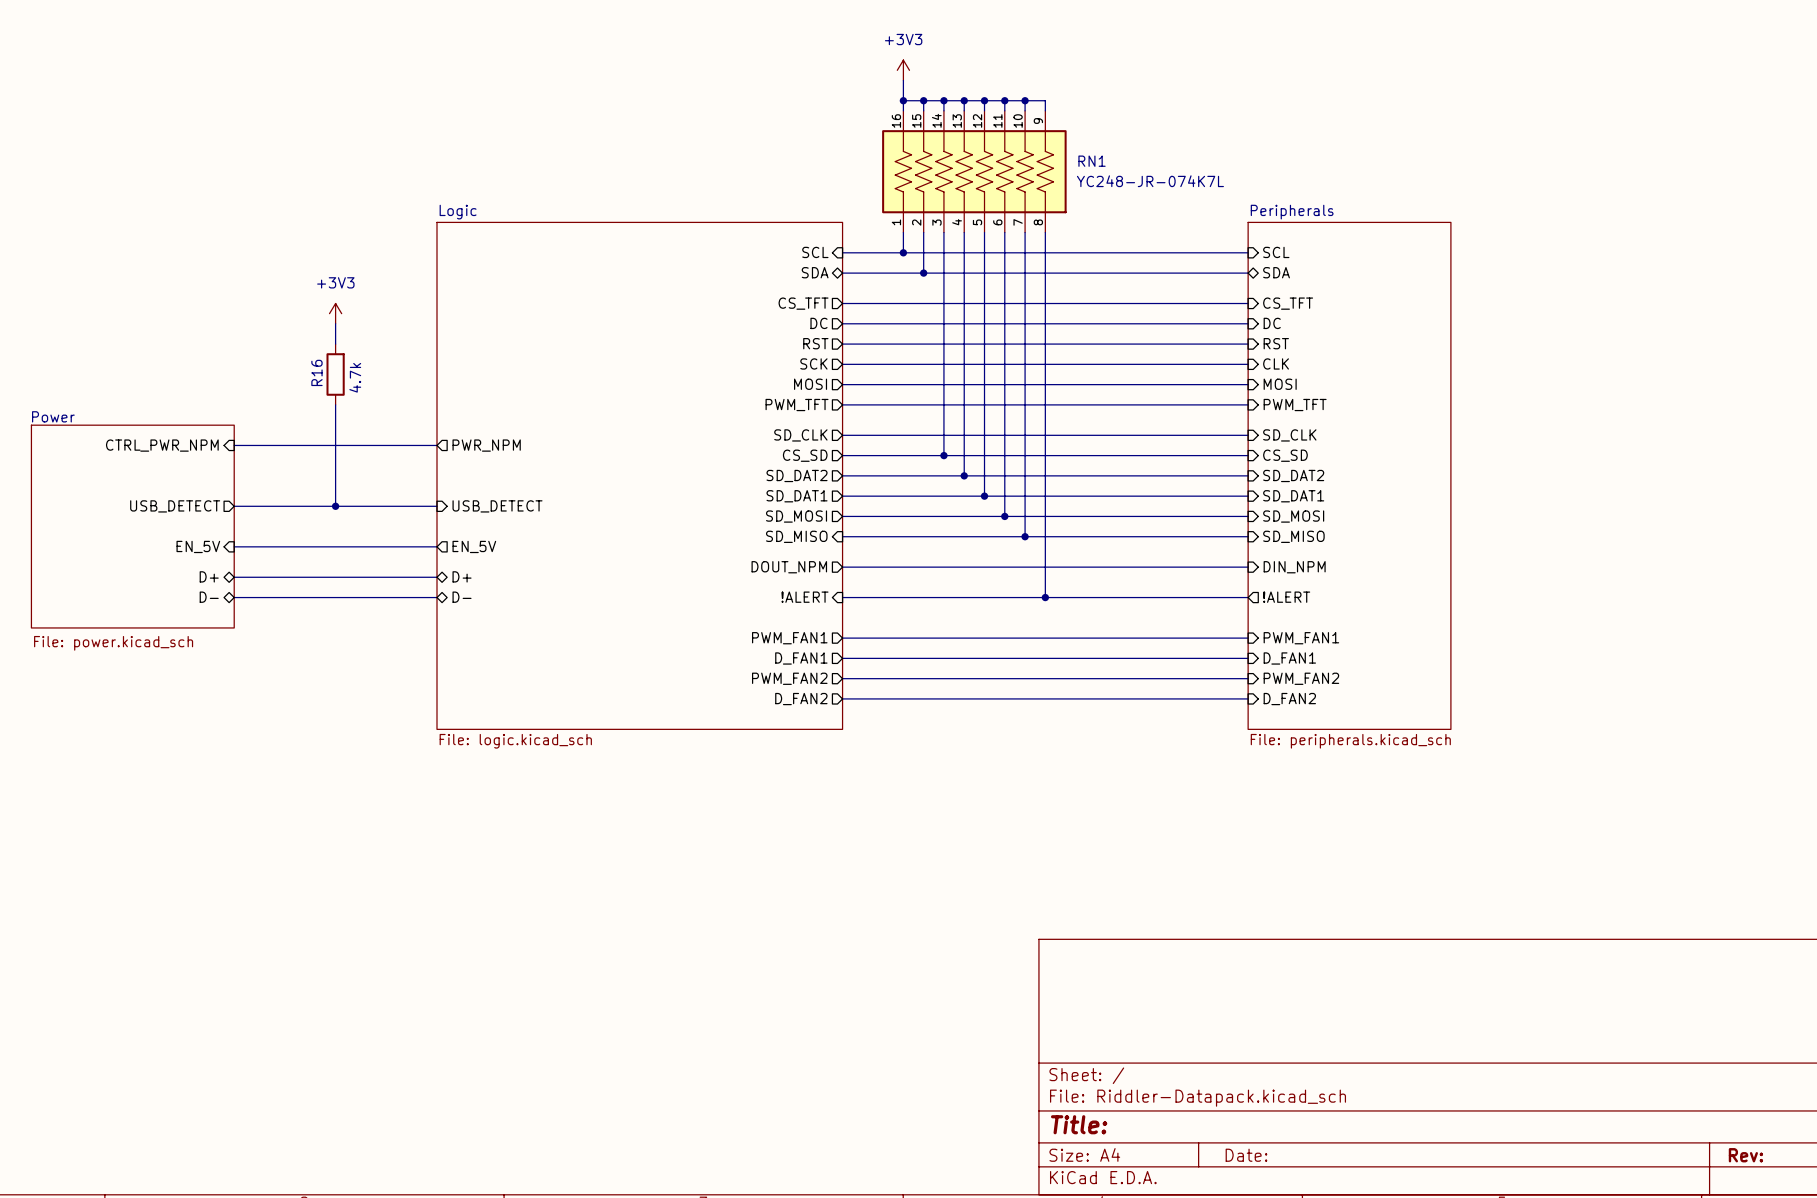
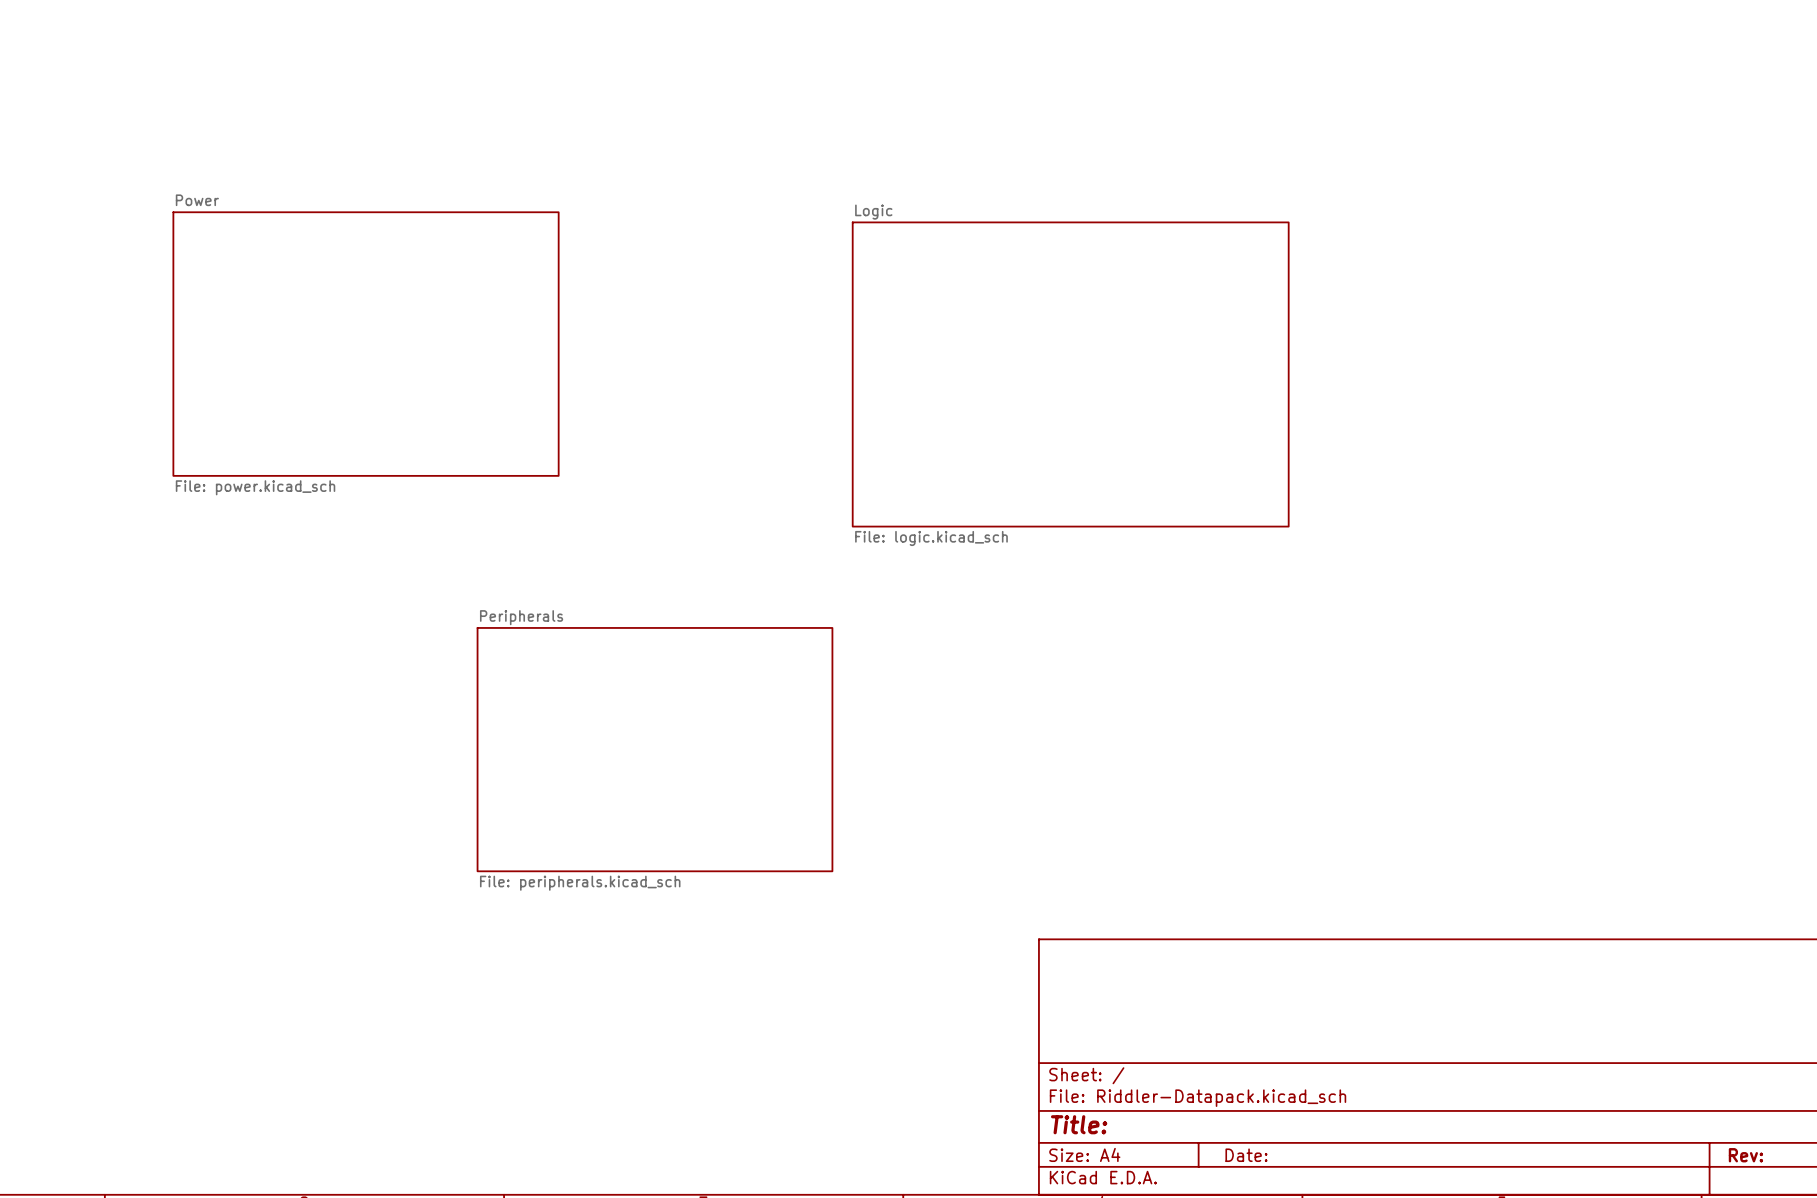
power symbol: +3V3 (903, 70) -> none
wire: (903, 80) (903, 110) -> none
wire: (903, 100) (1045, 100) (1045, 110) -> none
junction: (903, 100) -> none
wire: (923, 100) (923, 110) -> none
junction: (923, 100) -> none
wire: (943, 100) (943, 110) -> none
junction: (943, 100) -> none
wire: (964, 100) (964, 110) -> none
junction: (964, 100) -> none
wire: (984, 100) (984, 110) -> none
junction: (984, 100) -> none
wire: (1004, 100) (1004, 110) -> none
junction: (1004, 100) -> none
wire: (1025, 100) (1025, 110) -> none
junction: (1025, 100) -> none
RN1: YC248-JR-074K7L (974, 171) -> none
wire: (903, 232) (903, 252) -> none
wire: (923, 232) (923, 273) -> none
wire: (943, 232) (943, 455) -> none
wire: (964, 232) (964, 475) -> none
wire: (984, 232) (984, 496) -> none
wire: (1004, 232) (1004, 516) -> none
wire: (1025, 232) (1025, 536) -> none
wire: (1045, 232) (1045, 597) -> none
sheet pin: SCL (815, 252) -> none
wire: (842, 252) (1248, 252) -> none
junction: (903, 252) -> none
sheet pin: SCL (1276, 252) -> none
sheet pin: SDA (815, 272) -> none
sheet pin: SDA (1276, 272) -> none
wire: (842, 273) (1248, 273) -> none
junction: (923, 273) -> none
sheet pin: CS_TFT (803, 303) -> none
wire: (842, 303) (1248, 303) -> none
sheet pin: CS_TFT (1288, 303) -> none
power symbol: +3V3 (335, 313) -> none
wire: (335, 323) (335, 344) -> none
sheet pin: DC (818, 323) -> none
wire: (842, 323) (1248, 323) -> none
sheet pin: DC (1272, 323) -> none
sheet pin: RST (815, 343) -> none
sheet pin: RST (1276, 343) -> none
sheet Power: none -> File: power.kicad_sch (366, 344)
wire: (842, 344) (1248, 344) -> none
sheet pin: SCK (813, 363) -> none
sheet pin: CLK (1276, 363) -> none
wire: (842, 364) (1248, 364) -> none
R16: 4.7k (335, 374) -> none
sheet Logic: none -> File: logic.kicad_sch (1070, 374)
sheet pin: MOSI (810, 384) -> none
wire: (842, 384) (1248, 384) -> none
sheet pin: MOSI (1280, 384) -> none
wire: (335, 404) (335, 506) -> none
wire: (842, 404) (1248, 404) -> none
sheet pin: PWM_TFT (797, 405) -> none
sheet pin: PWM_TFT (1295, 405) -> none
sheet pin: SD_CLK (800, 435) -> none
wire: (842, 435) (1248, 435) -> none
sheet pin: SD_CLK (1289, 435) -> none
sheet pin: CTRL_PWR_NPM (162, 445) -> none
wire: (234, 445) (436, 445) -> none
sheet pin: PWR_NPM (486, 445) -> none
sheet pin: CS_SD (805, 455) -> none
wire: (842, 455) (1248, 455) -> none
junction: (943, 455) -> none
sheet pin: CS_SD (1285, 455) -> none
sheet Logic: File: logic.kicad_sch (639, 475) -> none
sheet pin: SD_DAT2 (797, 475) -> none
wire: (842, 475) (1248, 475) -> none
junction: (964, 475) -> none
sheet pin: SD_DAT2 (1293, 475) -> none
sheet Peripherals: File: peripherals.kicad_sch (1349, 475) -> none
sheet pin: SD_DAT1 (797, 496) -> none
wire: (842, 496) (1248, 496) -> none
junction: (984, 496) -> none
sheet pin: SD_DAT1 (1293, 496) -> none
sheet pin: USB_DETECT (175, 506) -> none
wire: (234, 506) (436, 506) -> none
junction: (335, 506) -> none
sheet pin: USB_DETECT (497, 506) -> none
sheet pin: SD_MOSI (796, 516) -> none
wire: (842, 516) (1248, 516) -> none
junction: (1004, 516) -> none
sheet pin: SD_MOSI (1293, 516) -> none
sheet Power: File: power.kicad_sch (132, 526) -> none
sheet pin: SD_MISO (796, 536) -> none
wire: (842, 536) (1248, 536) -> none
junction: (1025, 536) -> none
sheet pin: SD_MISO (1293, 536) -> none
sheet pin: EN_5V (198, 546) -> none
wire: (234, 546) (436, 546) -> none
sheet pin: EN_5V (474, 546) -> none
sheet pin: DOUT_NPM (789, 567) -> none
wire: (842, 567) (1248, 567) -> none
sheet pin: DIN_NPM (1294, 567) -> none
sheet pin: D+ (209, 576) -> none
sheet pin: D+ (462, 576) -> none
wire: (234, 577) (436, 577) -> none
sheet pin: D- (209, 597) -> none
wire: (234, 597) (436, 597) -> none
sheet pin: D- (462, 597) -> none
sheet pin: !ALERT (804, 597) -> none
wire: (842, 597) (1248, 597) -> none
junction: (1045, 597) -> none
sheet pin: !ALERT (1286, 597) -> none
sheet pin: PWM_FAN1 (789, 638) -> none
wire: (842, 638) (1248, 638) -> none
sheet pin: PWM_FAN1 (1301, 638) -> none
sheet pin: D_FAN1 (801, 658) -> none
wire: (842, 658) (1248, 658) -> none
sheet pin: D_FAN1 (1289, 658) -> none
sheet pin: PWM_FAN2 (789, 678) -> none
wire: (842, 678) (1248, 678) -> none
sheet pin: PWM_FAN2 (1301, 678) -> none
wire: (842, 698) (1248, 698) -> none
sheet pin: D_FAN2 (801, 699) -> none
sheet pin: D_FAN2 (1289, 699) -> none
sheet Peripherals: none -> File: peripherals.kicad_sch (654, 749)

